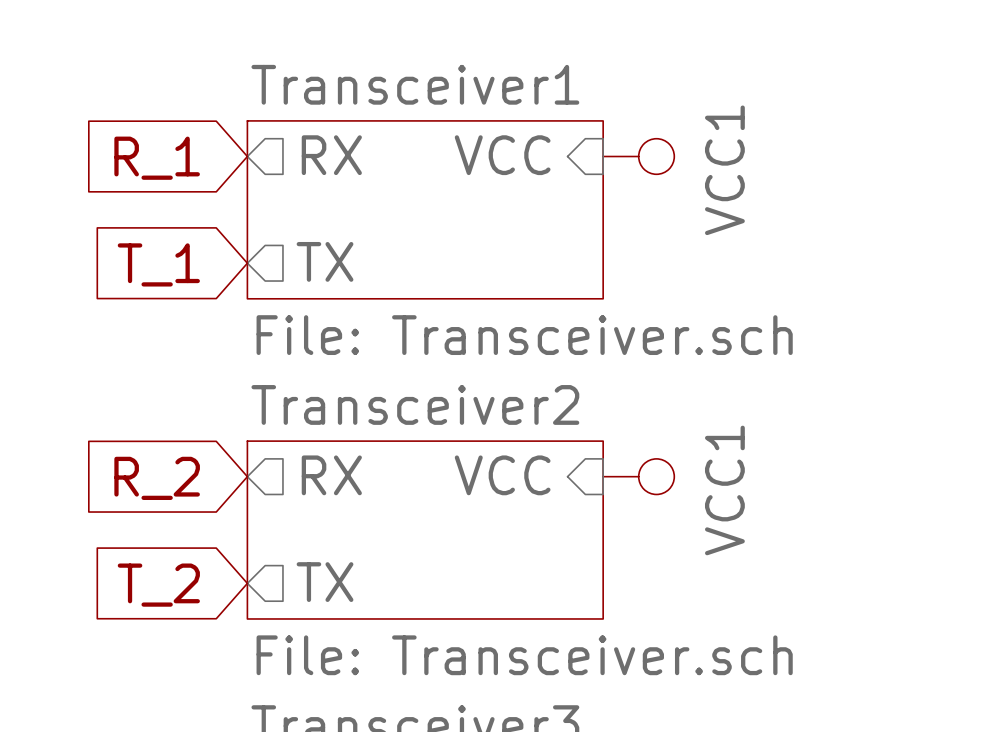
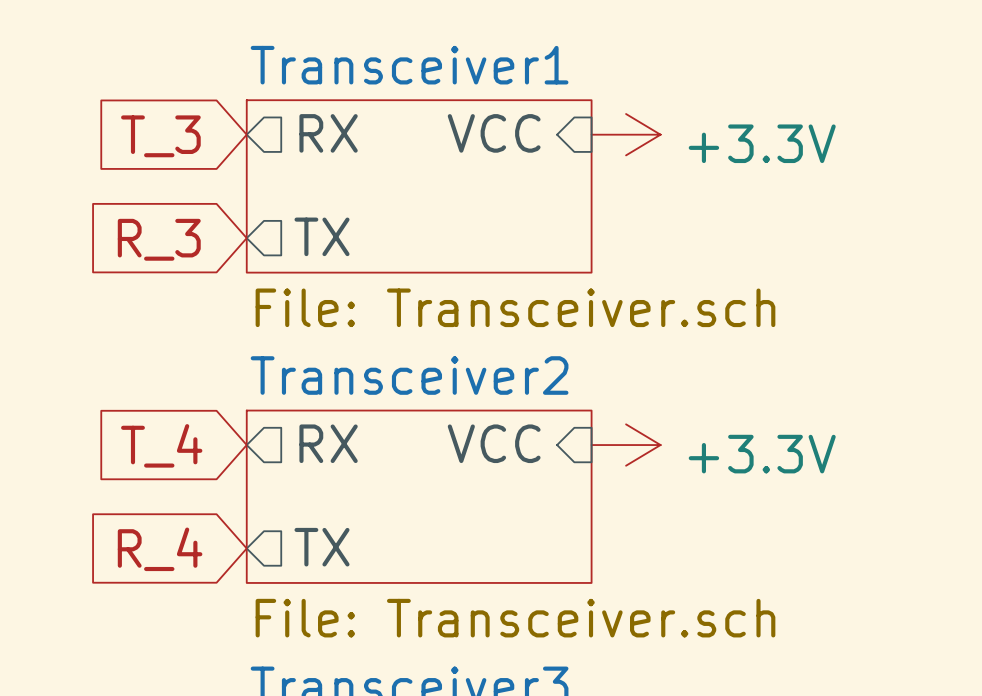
power symbol: VCC1 (638, 156) -> +3.3V (626, 134)
global label: R_1 (157, 158) -> T_3 (160, 136)
global label: T_1 (158, 264) -> R_3 (159, 239)
power symbol: VCC1 (638, 476) -> +3.3V (626, 445)
global label: R_2 (157, 478) -> T_4 (161, 445)
global label: T_2 (158, 585) -> R_4 (160, 549)

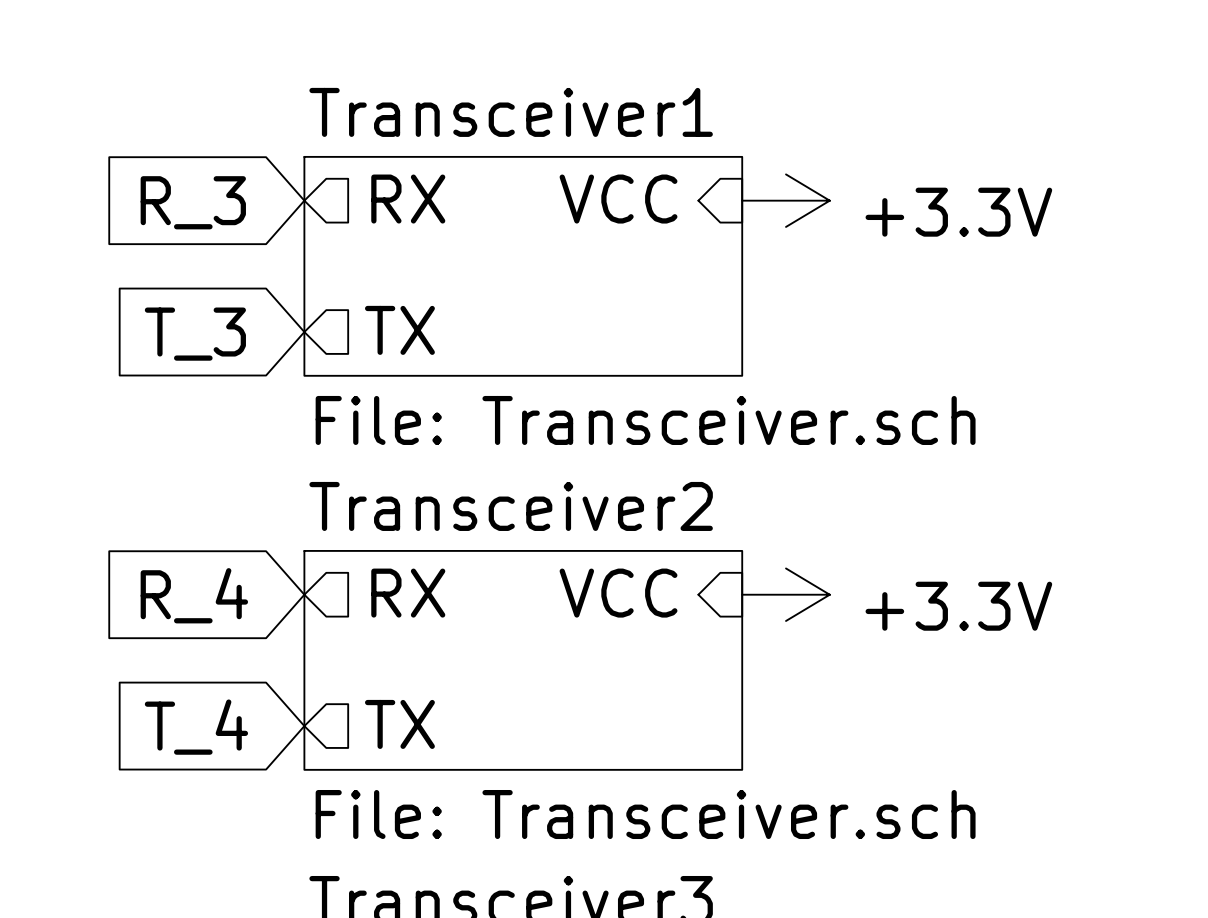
global label: T_3 (160, 136) -> R_3 (193, 202)
global label: R_3 (159, 239) -> T_3 (195, 334)
global label: T_4 (161, 445) -> R_4 (194, 595)
global label: R_4 (160, 549) -> T_4 (196, 727)

